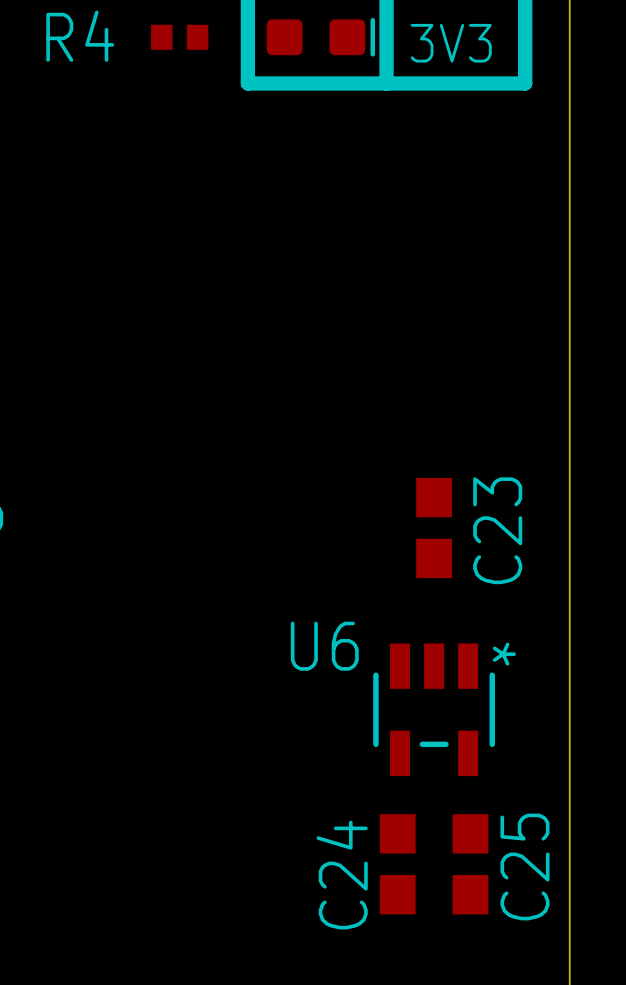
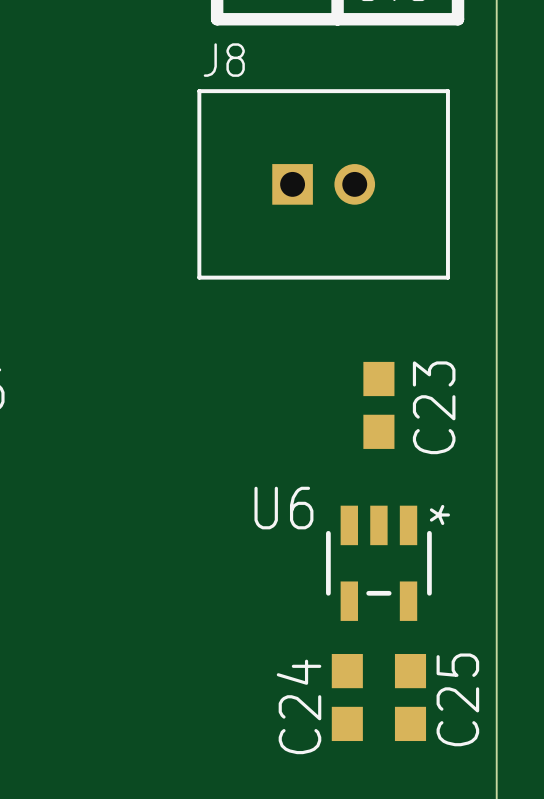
J8: none -> (323, 184)

